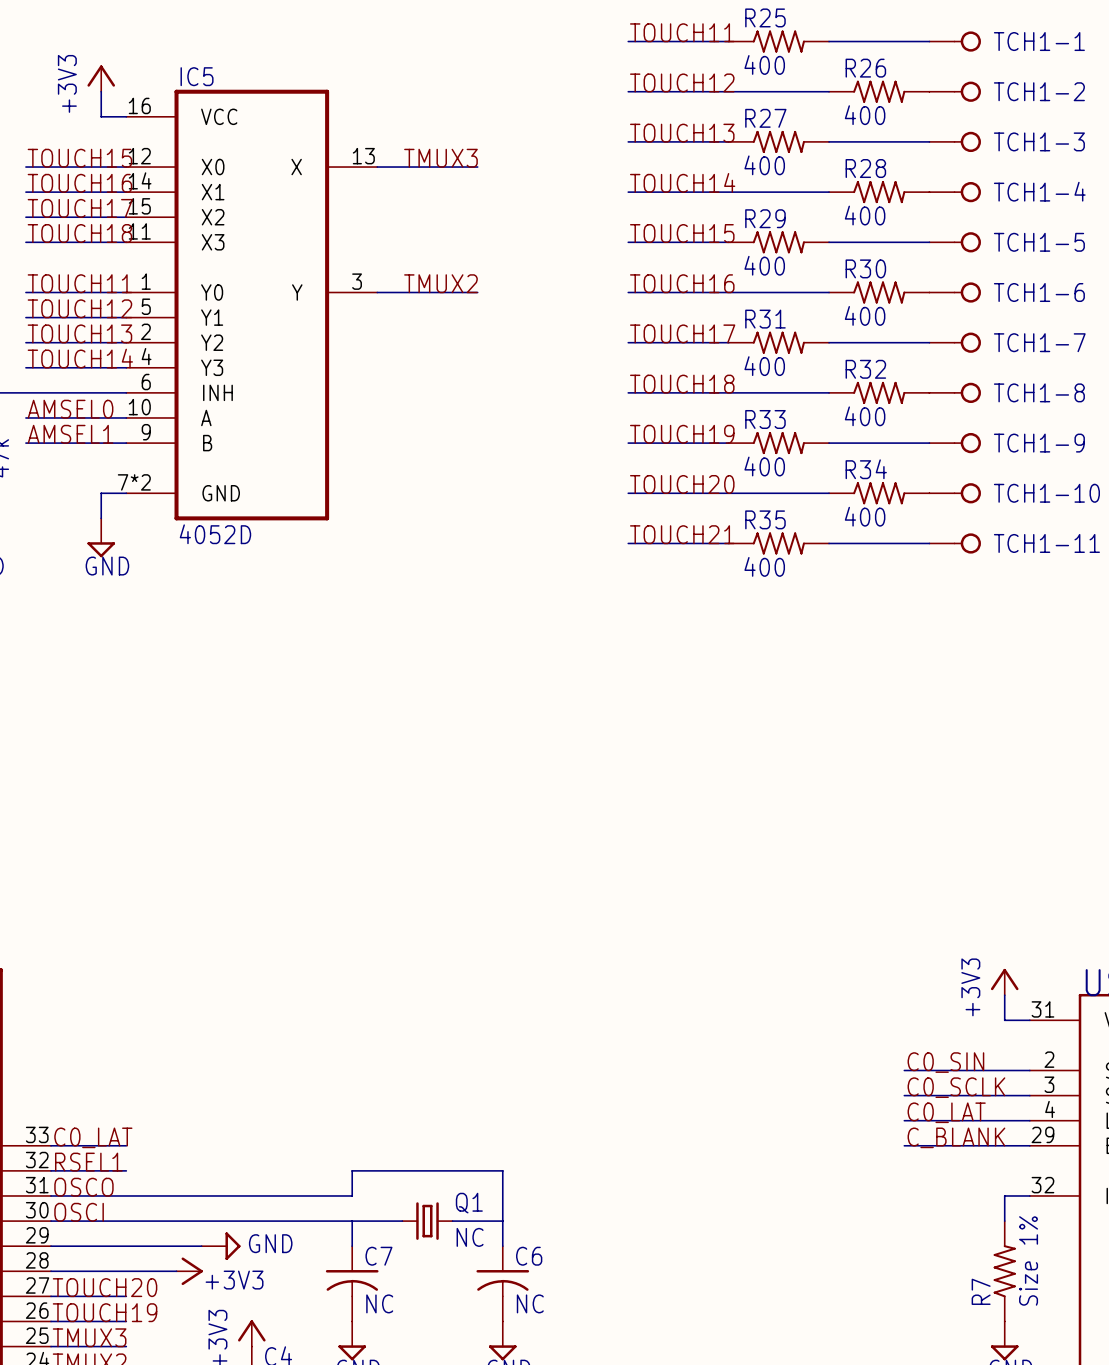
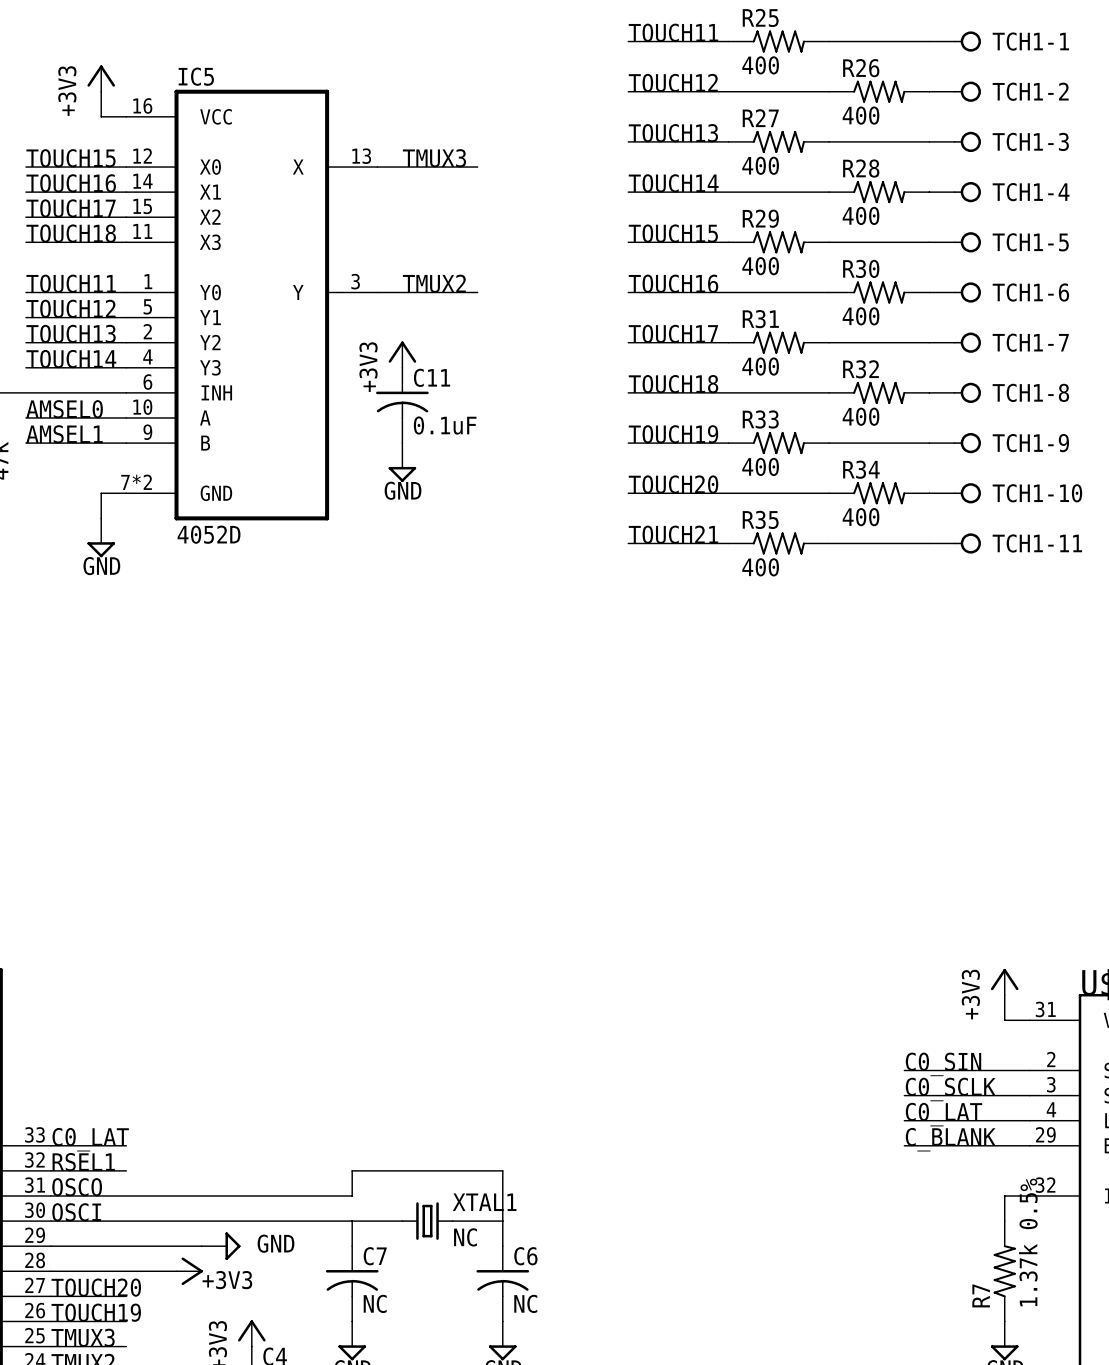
power symbol: none -> +3V3 (402, 354)
C11: none -> 0.1uF (402, 405)
power symbol: none -> GND (402, 462)
Q1 name: Q1 (469, 1203) -> XTAL1 (484, 1202)
R7 value: Size 1% (1028, 1260) -> 1.37k 0.5% (1028, 1242)

